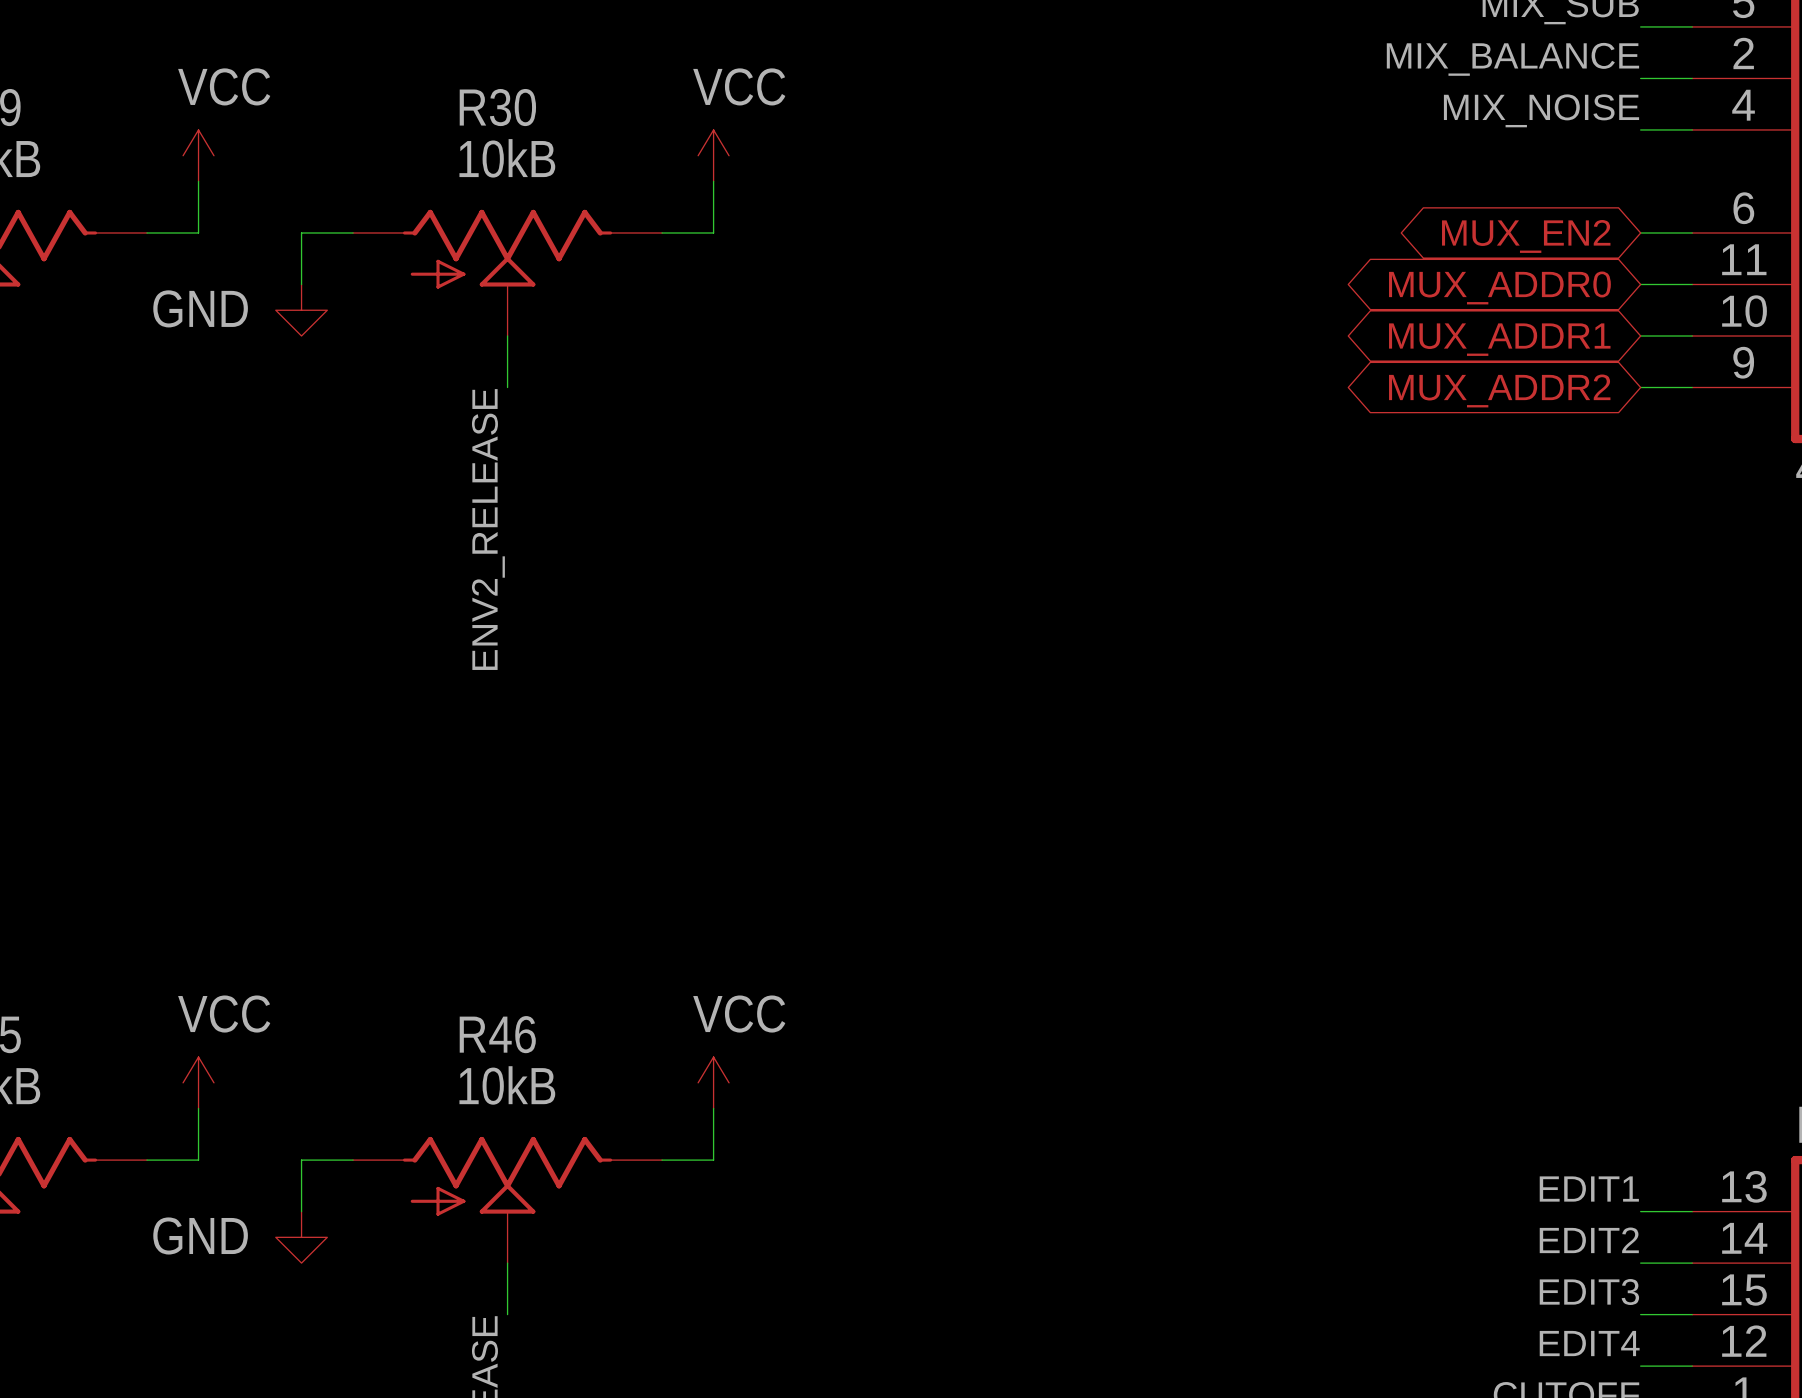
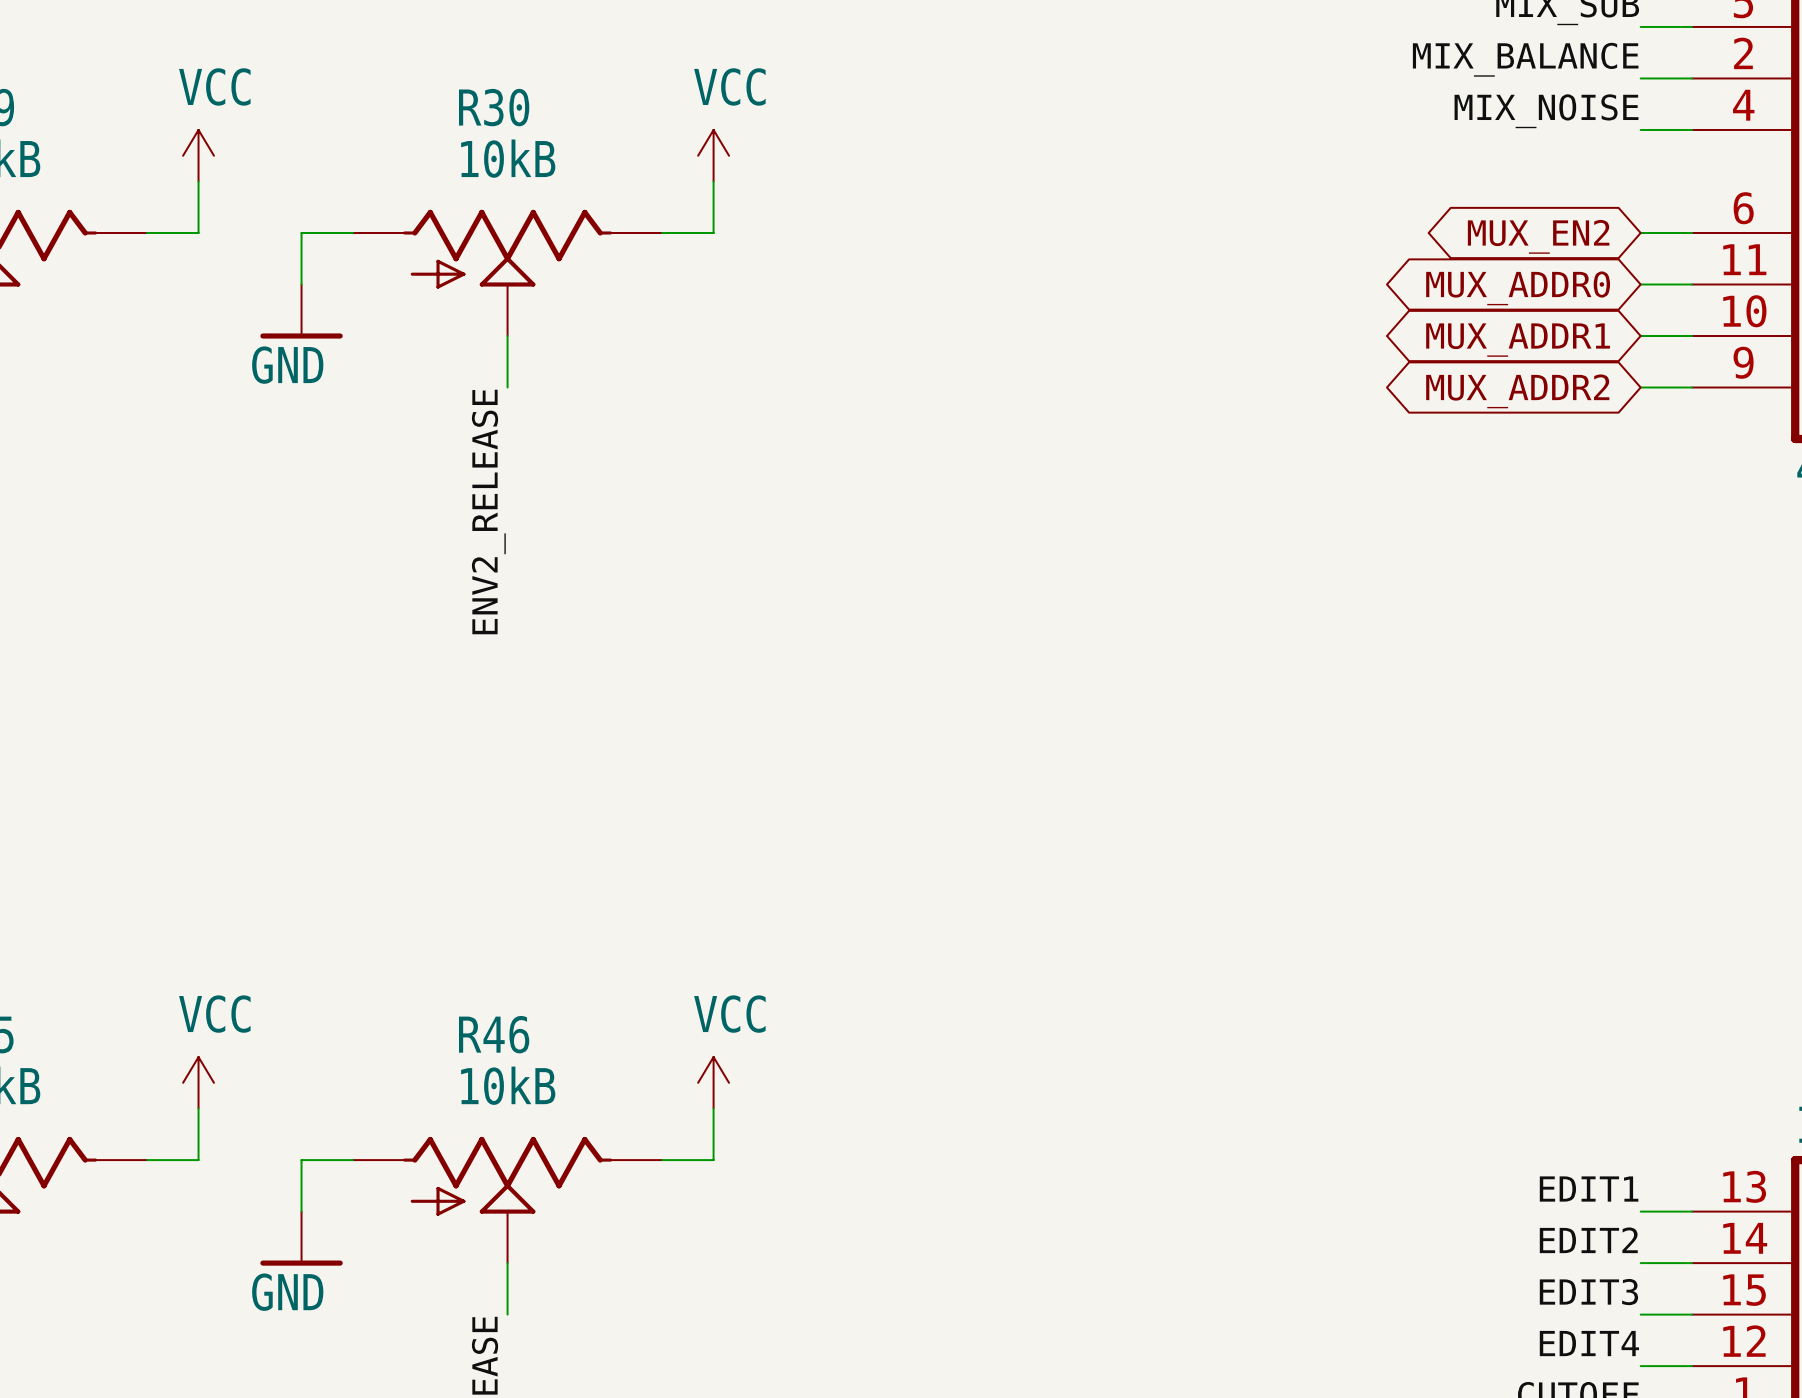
power symbol shape: [275, 284, 328, 337] -> [260, 284, 343, 339]
power symbol text position: GND (200, 308) -> GND (287, 365)
power symbol shape: [275, 1211, 328, 1264] -> [260, 1211, 343, 1266]
power symbol text position: GND (200, 1235) -> GND (287, 1292)

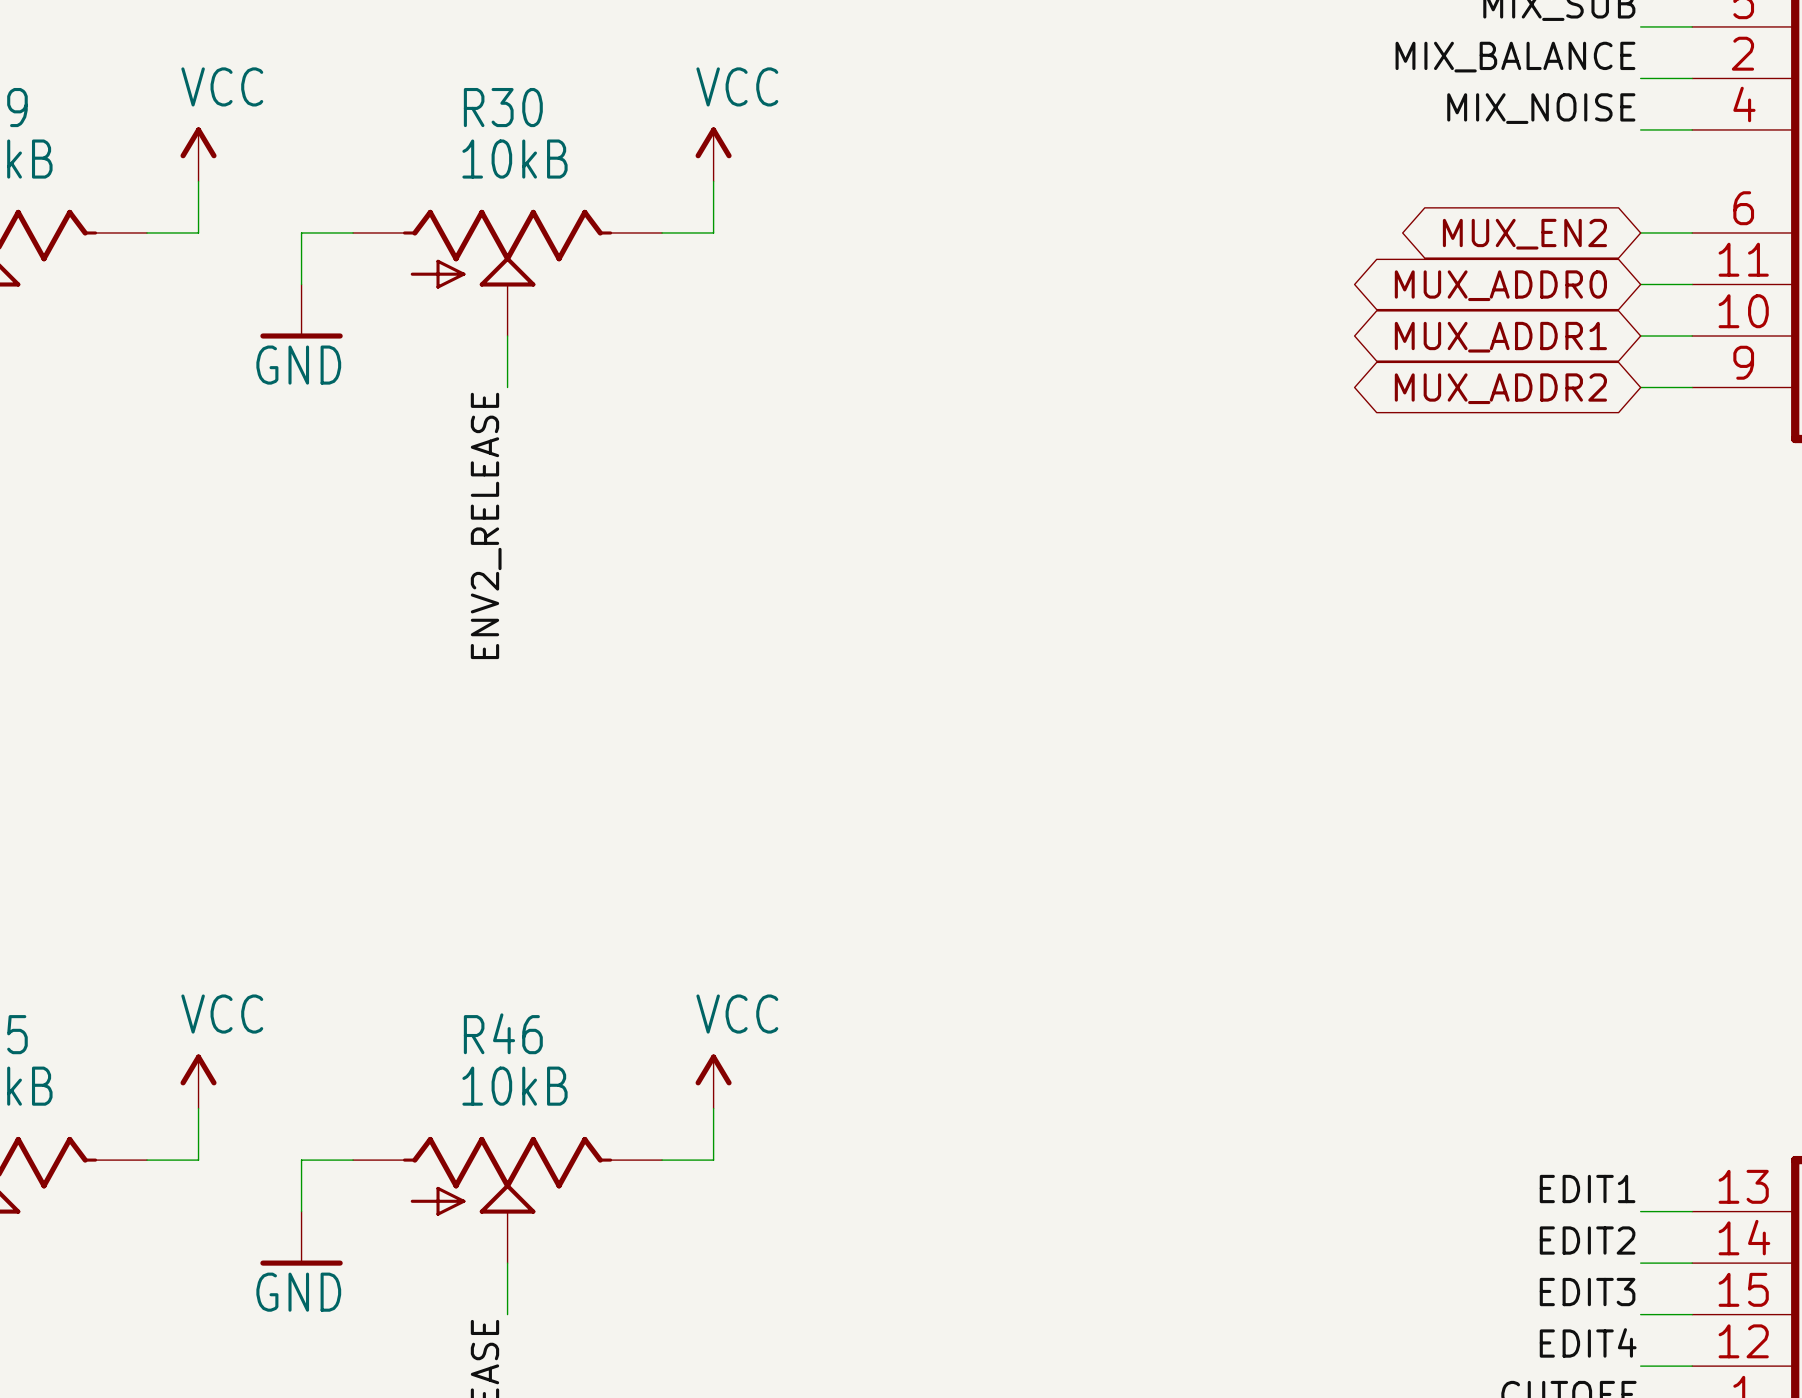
power symbol shape: [183, 129, 214, 182] -> [180, 127, 217, 182]
power symbol shape: [698, 129, 730, 182] -> [695, 127, 732, 182]
power symbol shape: [183, 1057, 214, 1109] -> [180, 1054, 217, 1109]
power symbol shape: [698, 1057, 730, 1109] -> [695, 1054, 732, 1109]

